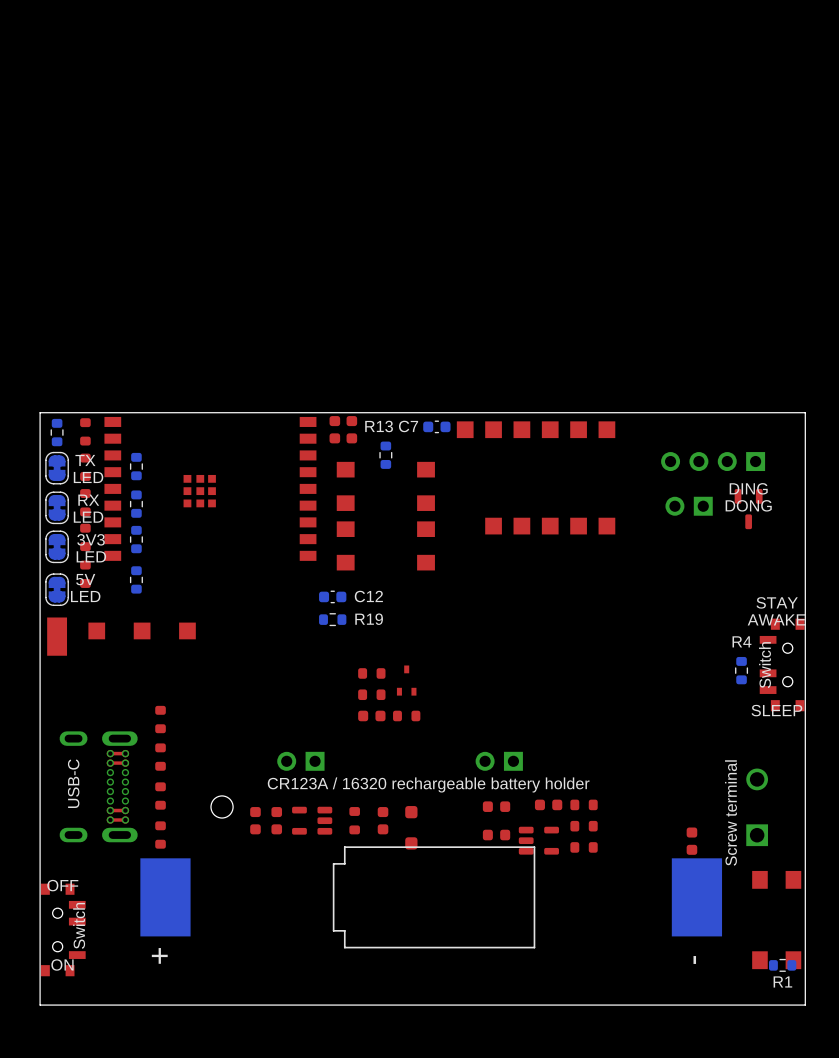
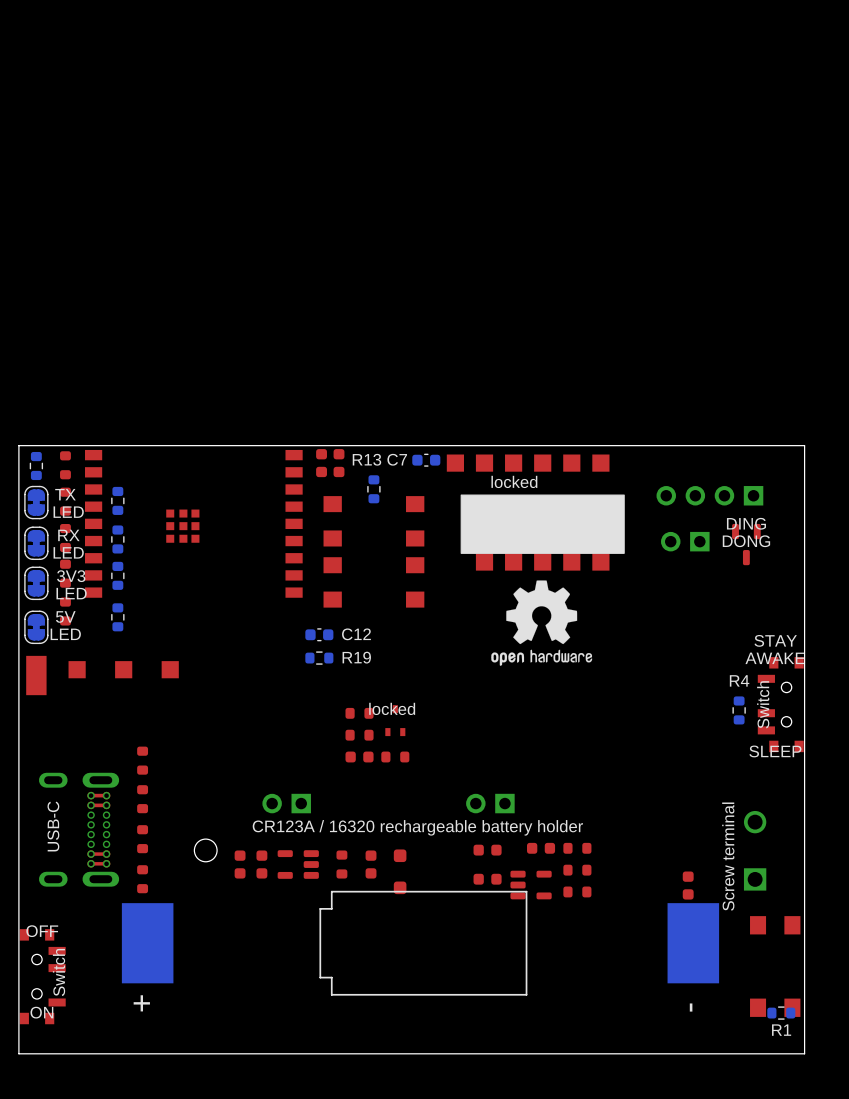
text: none -> locked (514, 481)
drawing: none -> [460, 494, 625, 554]
drawing: none -> [491, 580, 593, 666]
text: none -> locked (392, 708)

